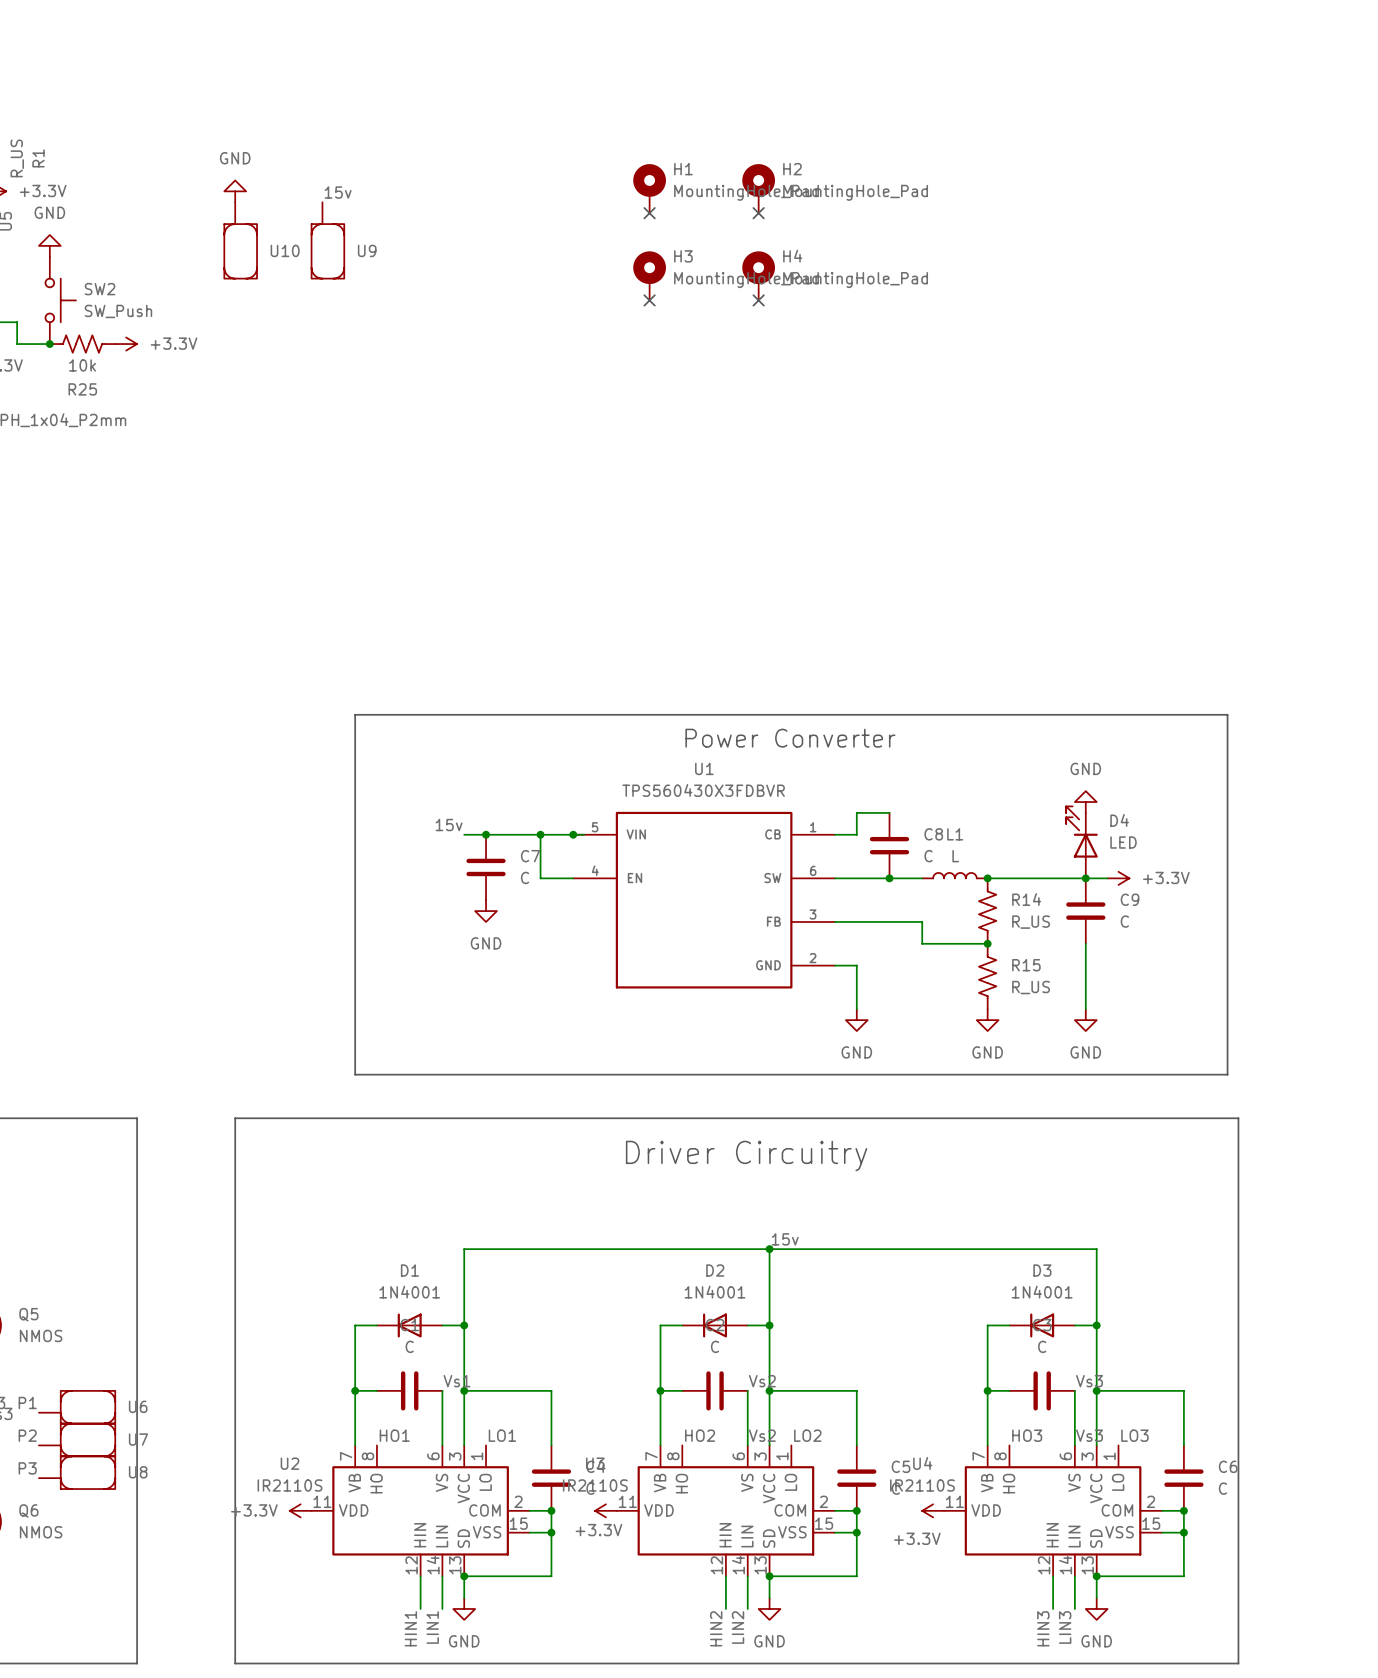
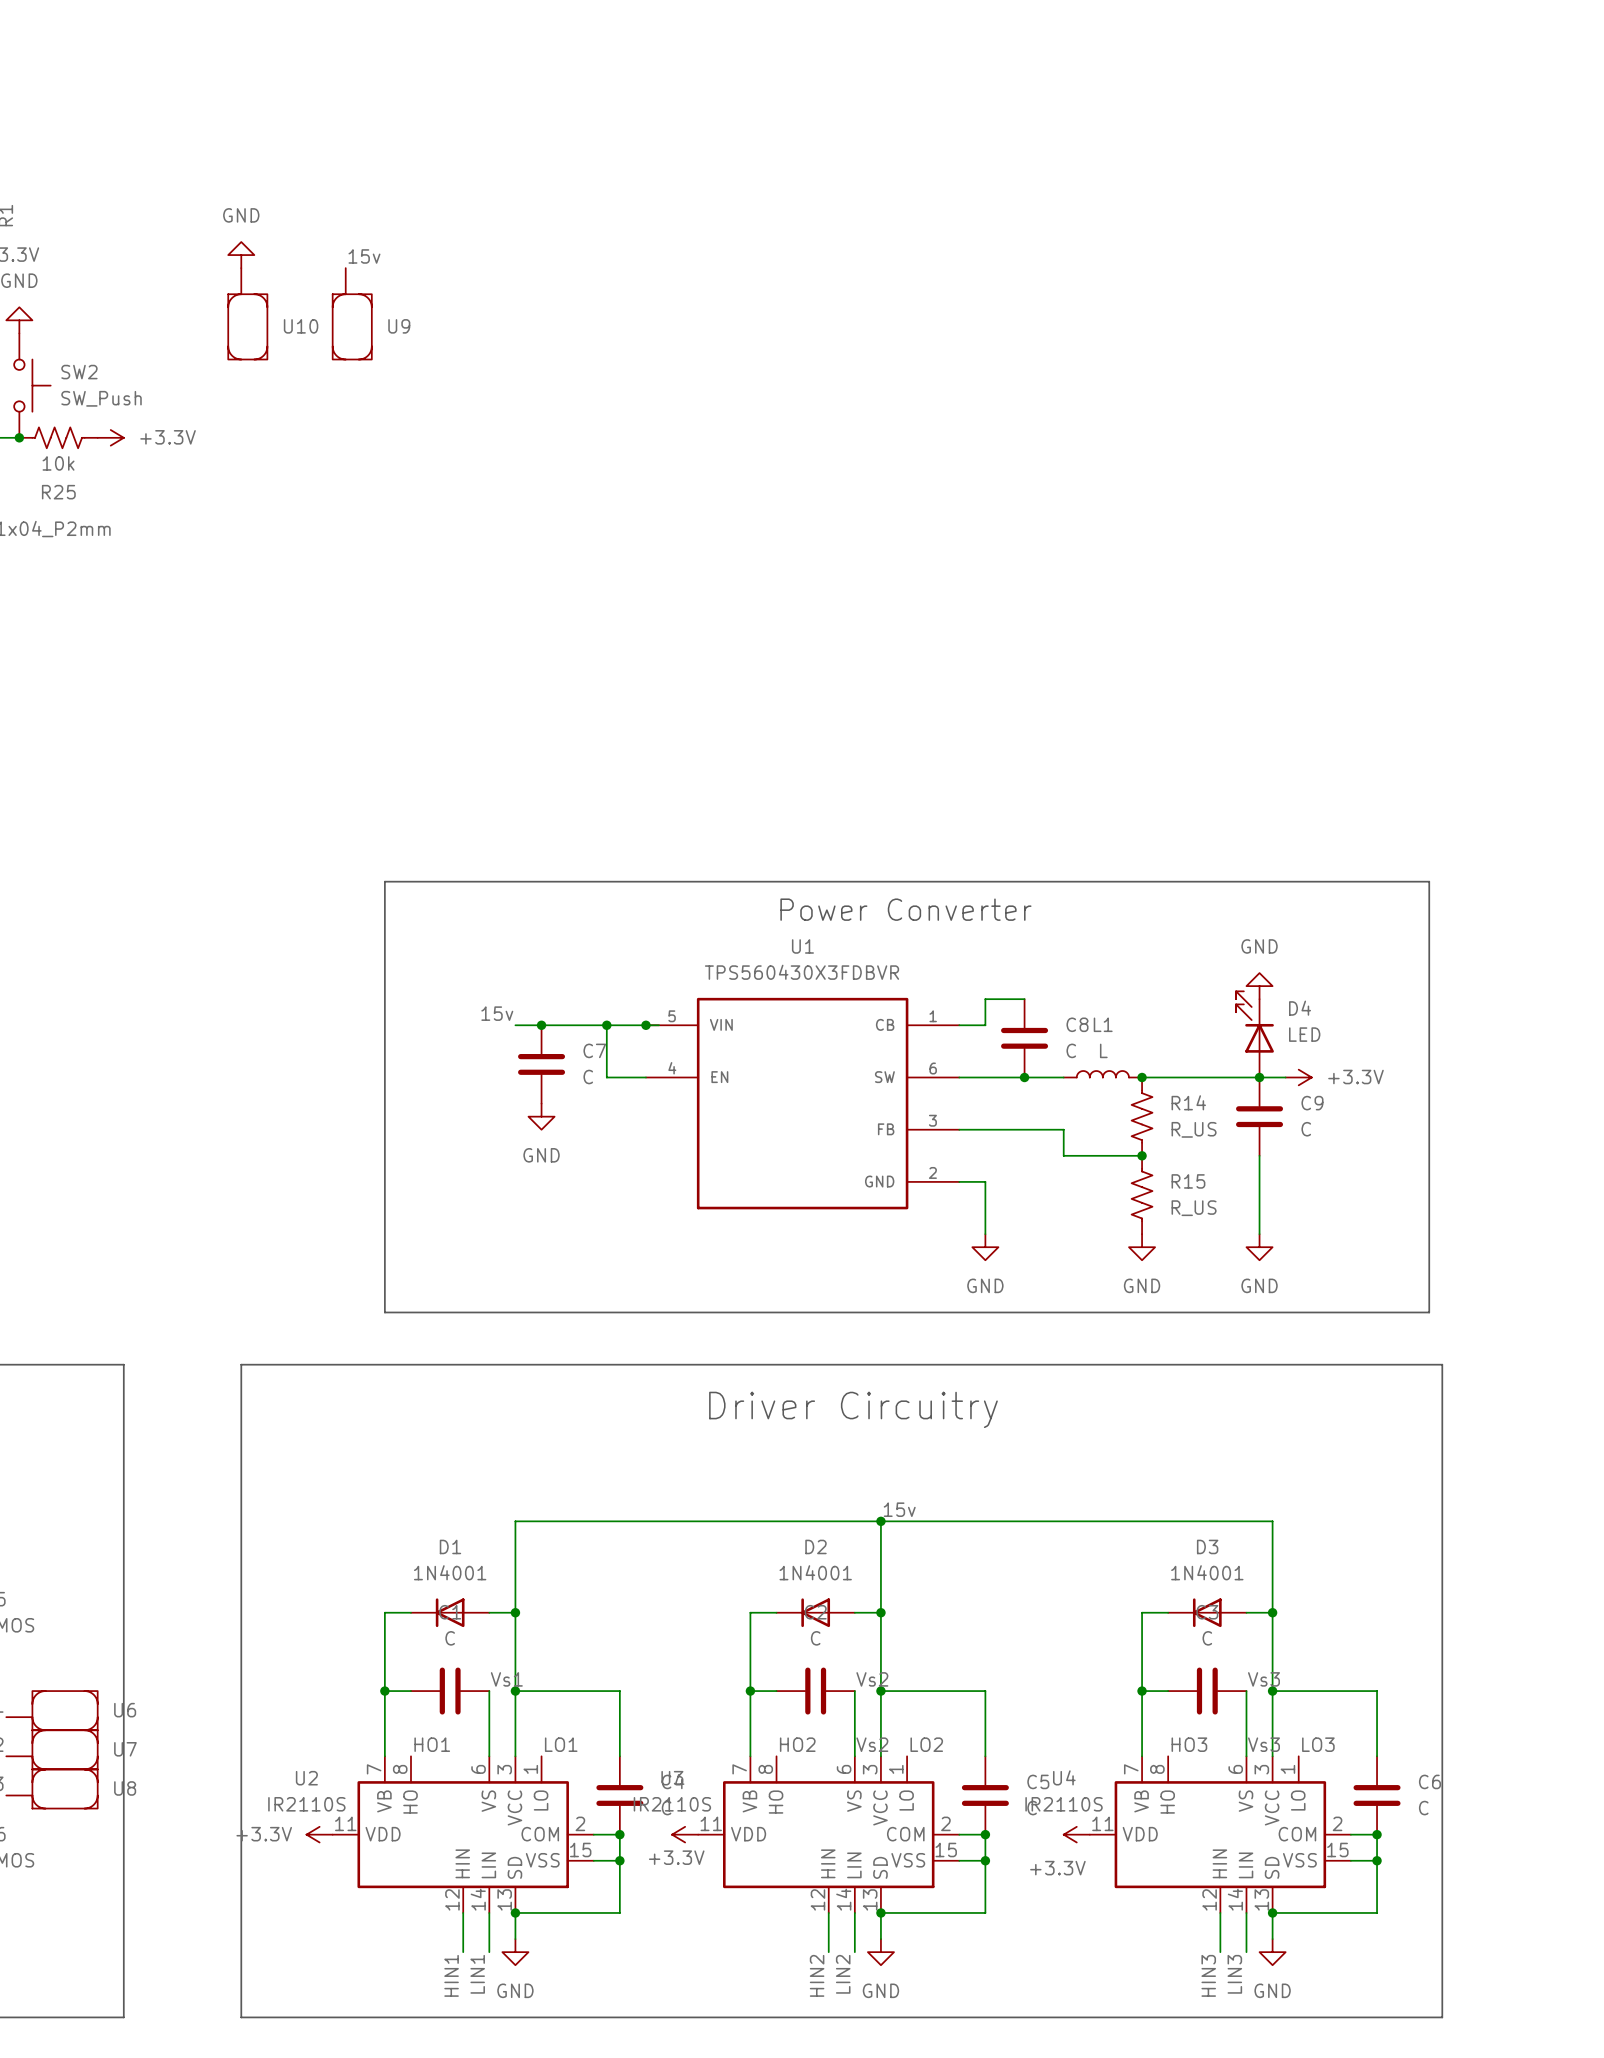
H1: MountingHole_Pad (649, 188) -> none
H2: MountingHole_Pad (758, 188) -> none
no-connect mark: (649, 213) -> none
no-connect mark: (758, 213) -> none
H3: MountingHole_Pad (649, 275) -> none
H4: MountingHole_Pad (758, 275) -> none
no-connect mark: (649, 300) -> none
no-connect mark: (758, 300) -> none

